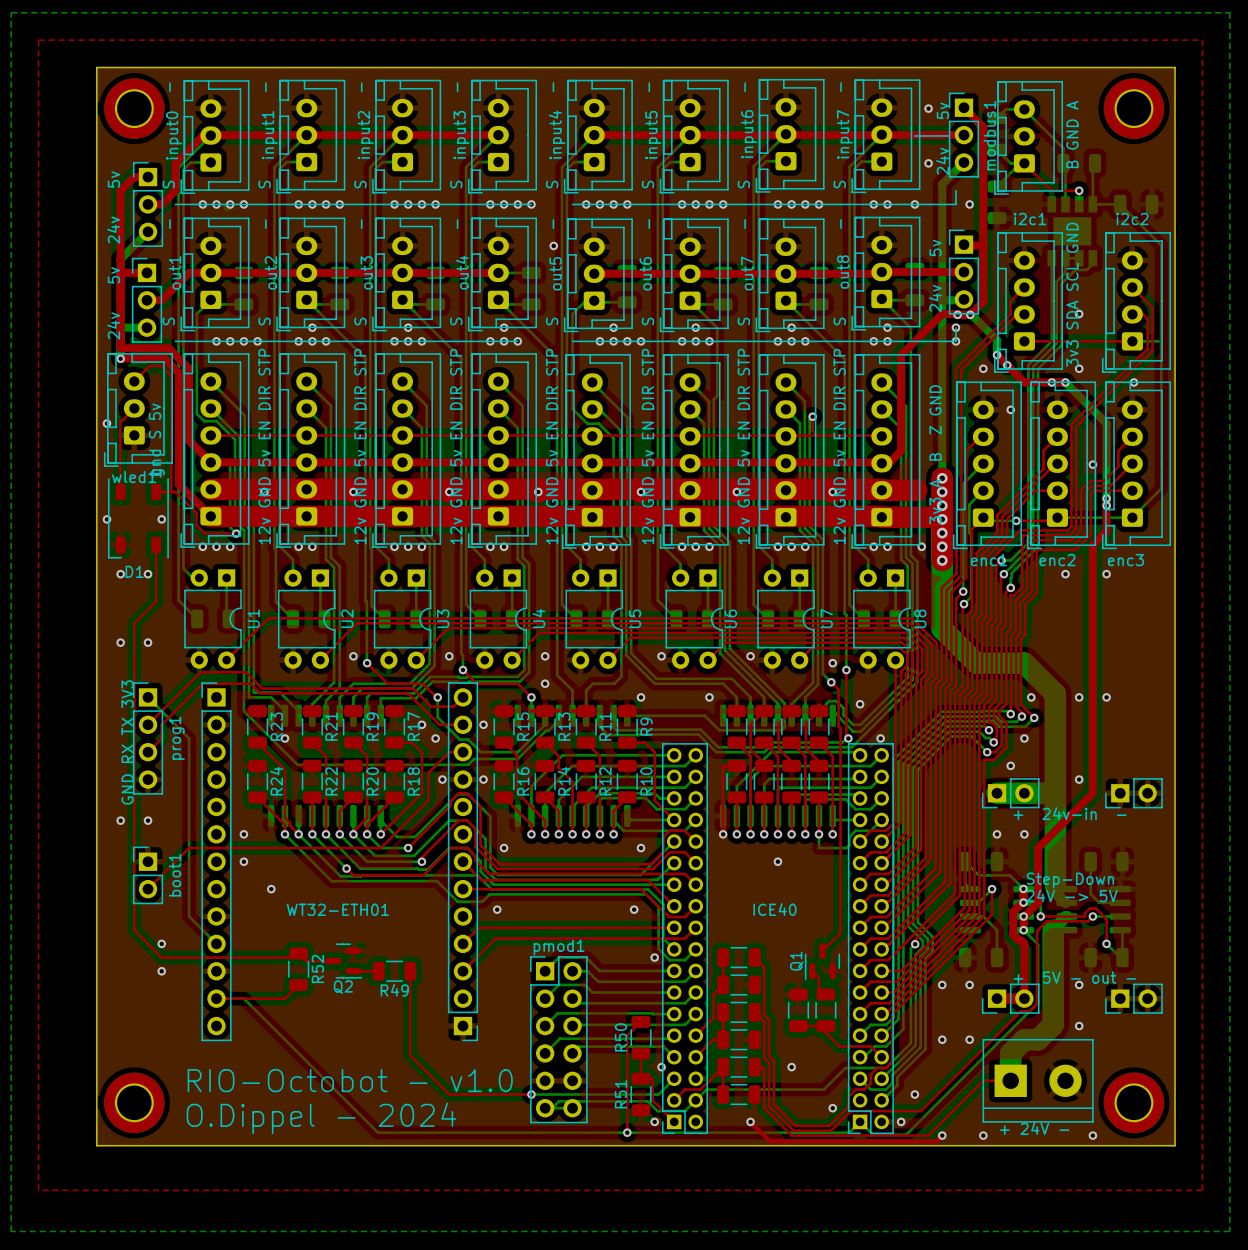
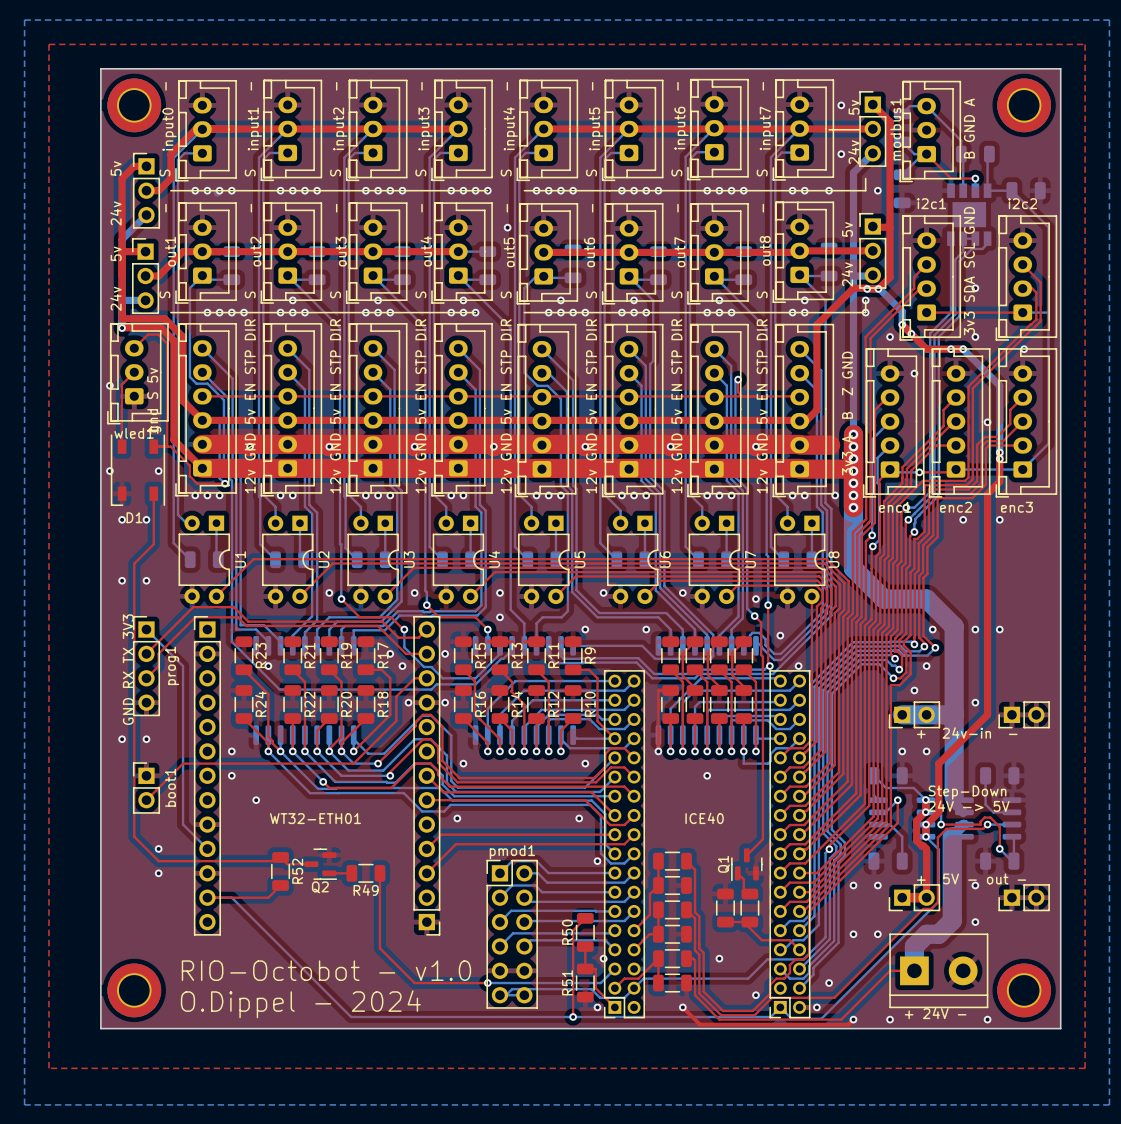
text: 12v GND 5v EN DIR STP (264, 446) -> 12v GND 5v EN STP DIR (250, 406)
text: 12v GND 5v EN DIR STP (360, 446) -> 12v GND 5v EN STP DIR (335, 406)
text: 12v GND 5v EN DIR STP (456, 446) -> 12v GND 5v EN STP DIR (420, 406)
text: 12v GND 5v EN DIR STP (552, 446) -> 12v GND 5v EN STP DIR (506, 406)
text: 12v GND 5v EN DIR STP (647, 446) -> 12v GND 5v EN STP DIR (591, 406)
text: 12v GND 5v EN DIR STP (743, 446) -> 12v GND 5v EN STP DIR (676, 406)
text: 12v GND 5v EN DIR STP (839, 446) -> 12v GND 5v EN STP DIR (762, 406)

